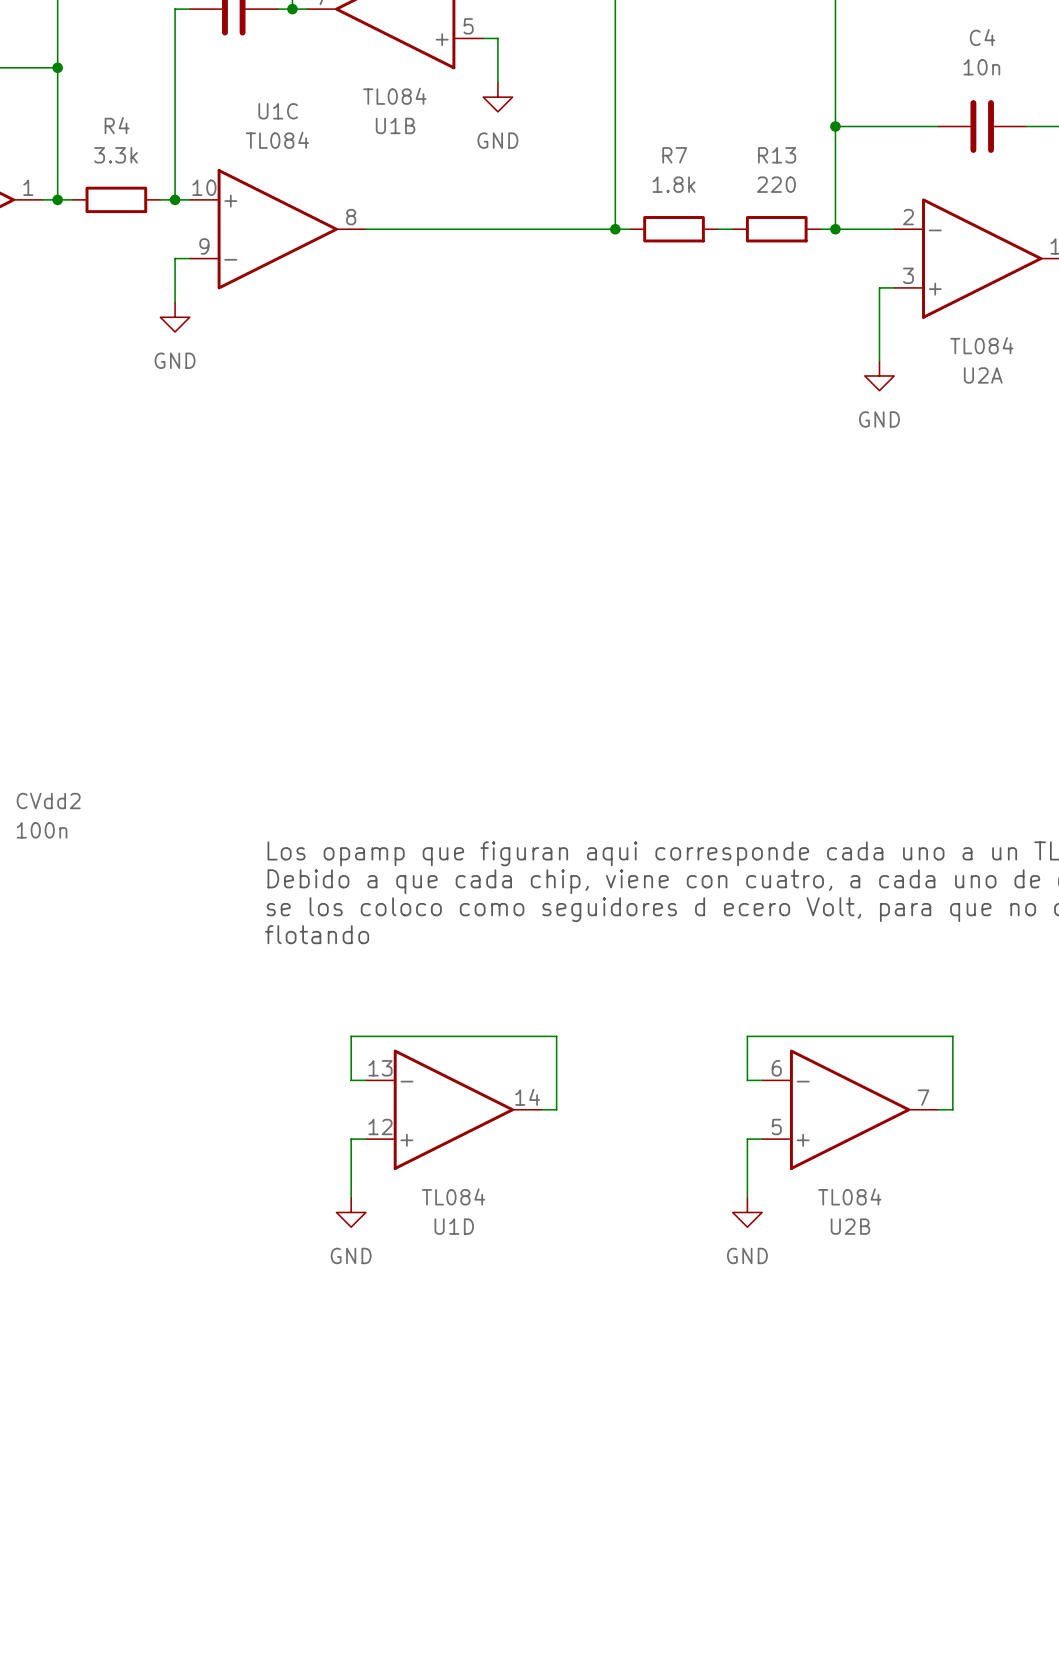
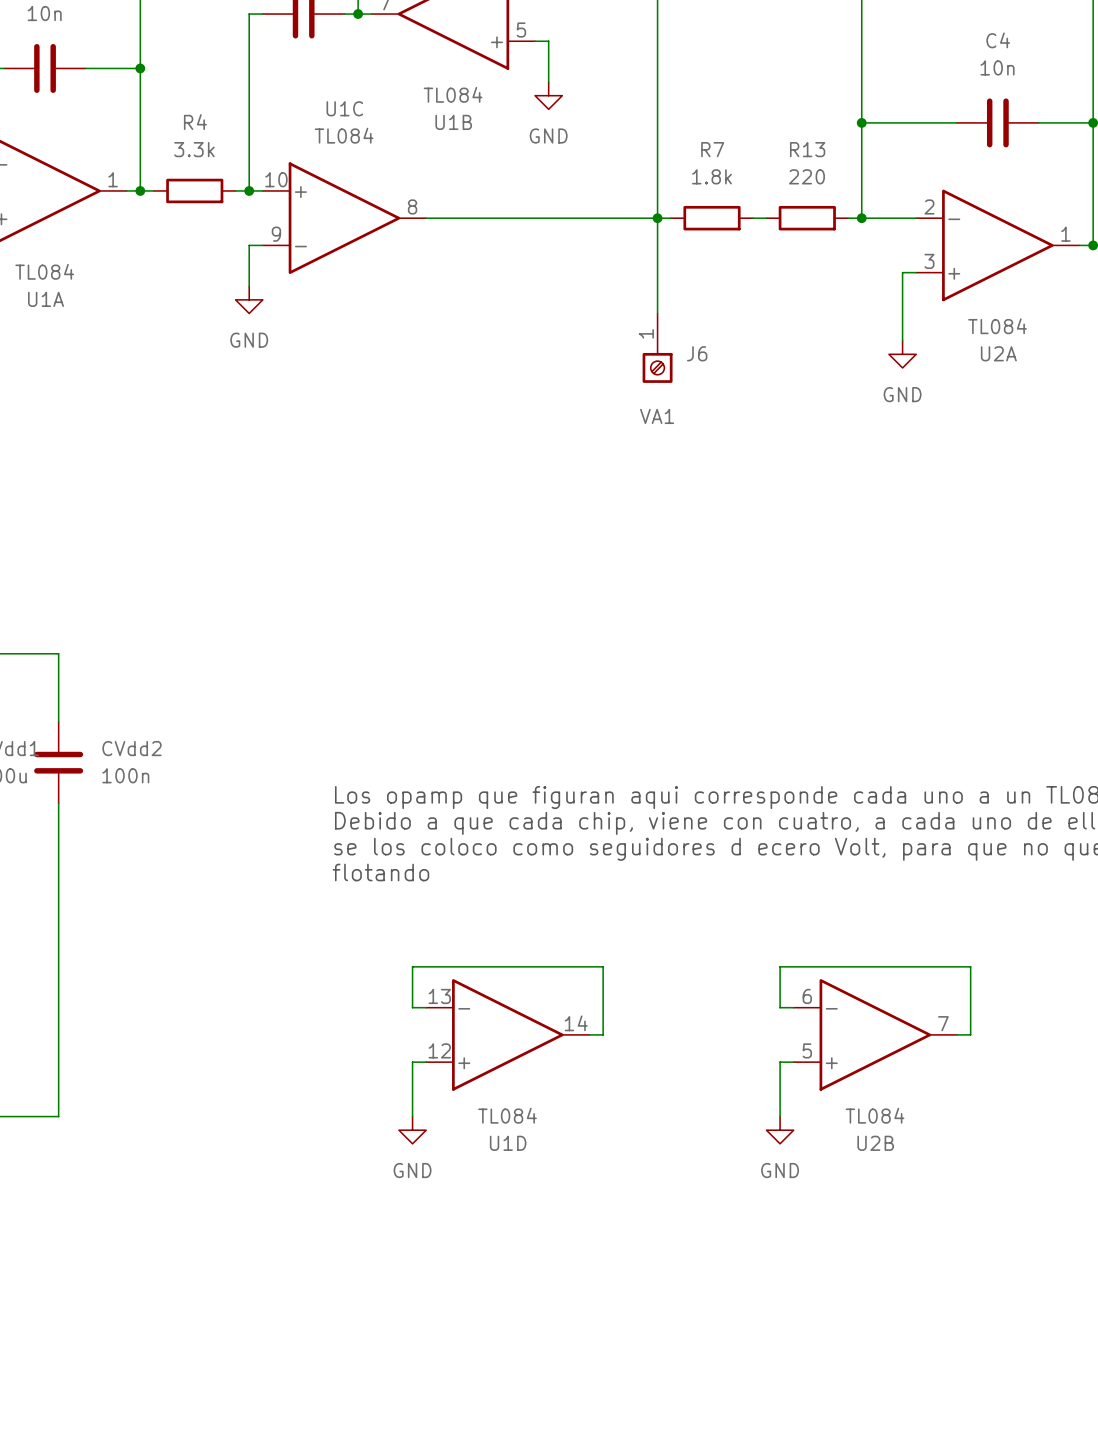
wire: none -> (657, 218) (657, 313)
J6: none -> VA1 (657, 348)

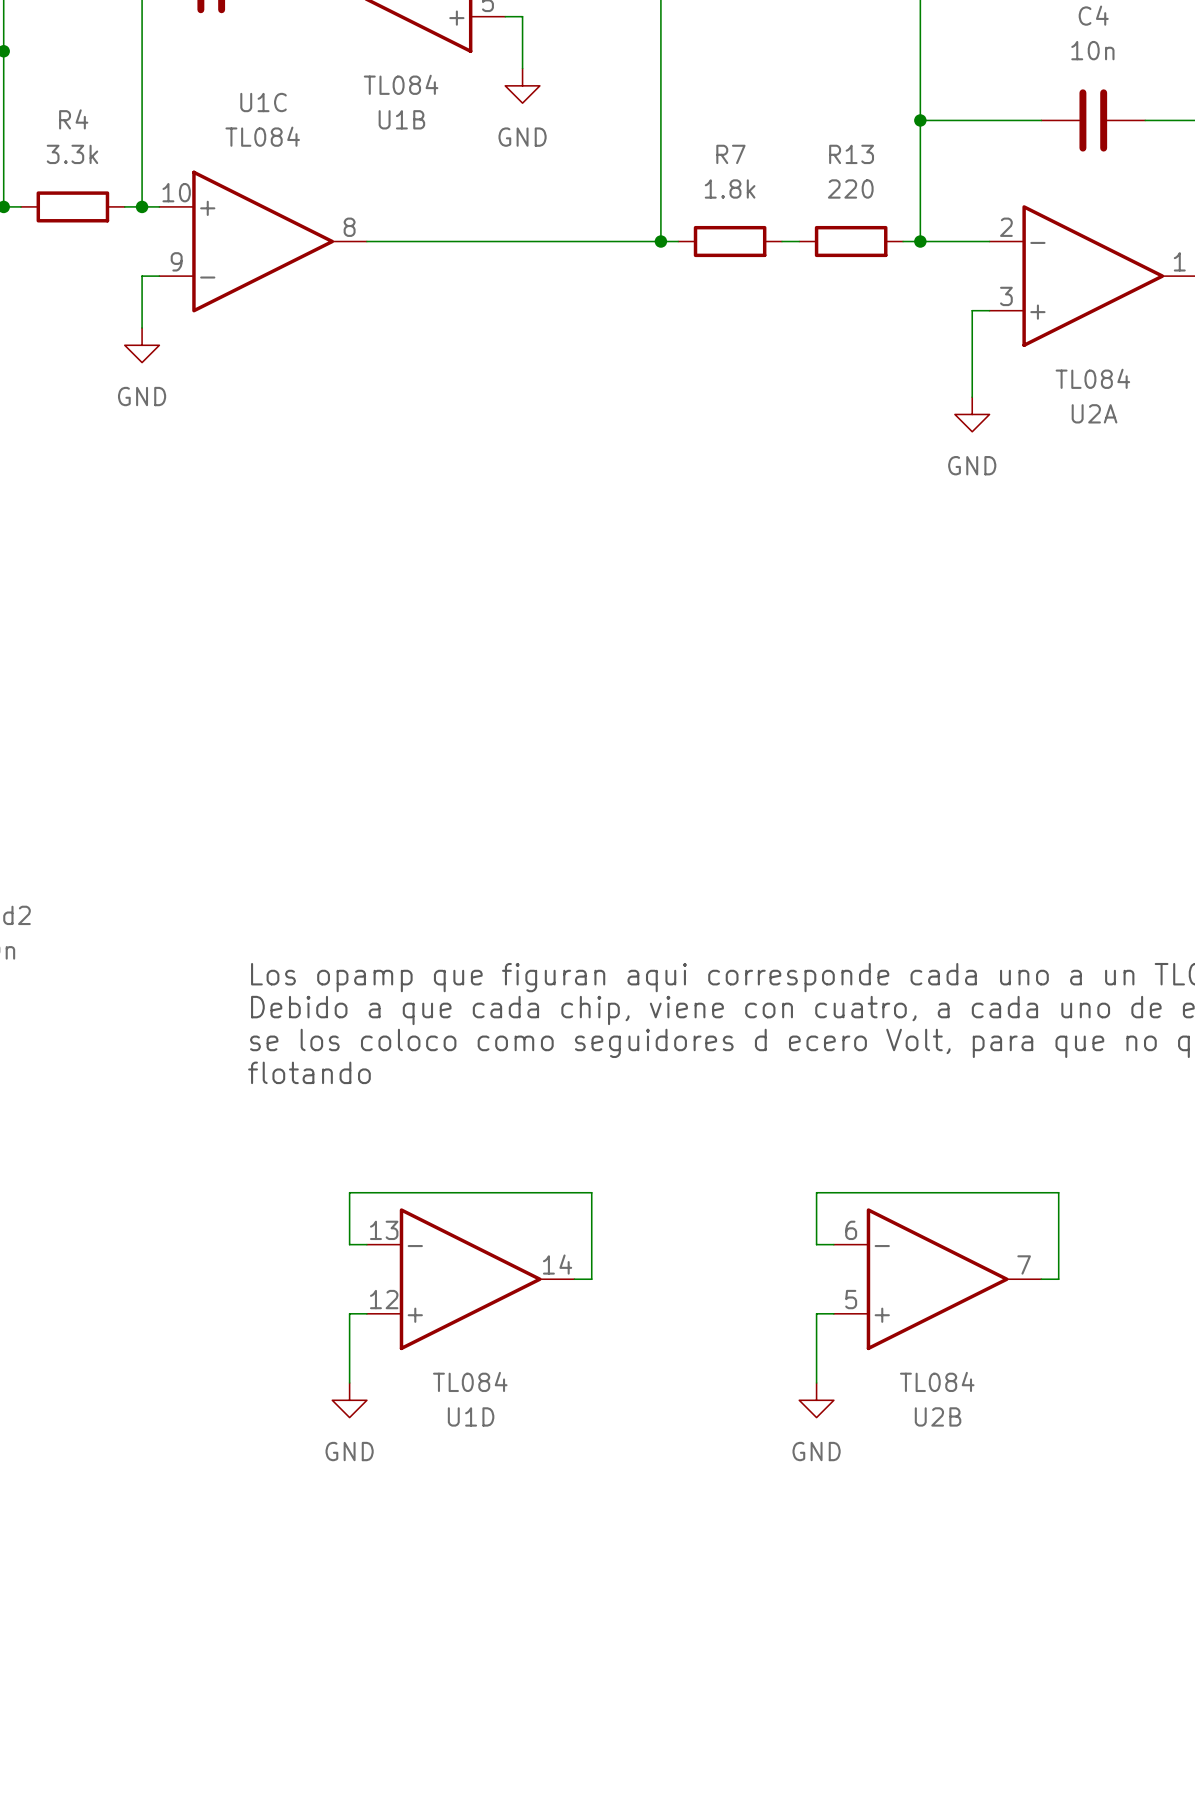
wire: (657, 218) (657, 313) -> none
J6: VA1 (657, 348) -> none

